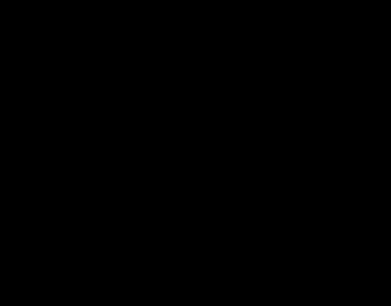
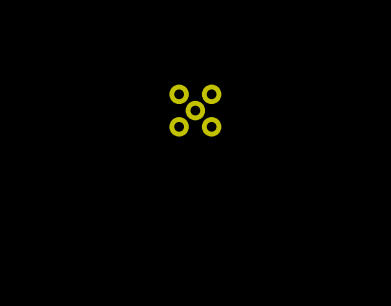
part: none -> (195, 110)

